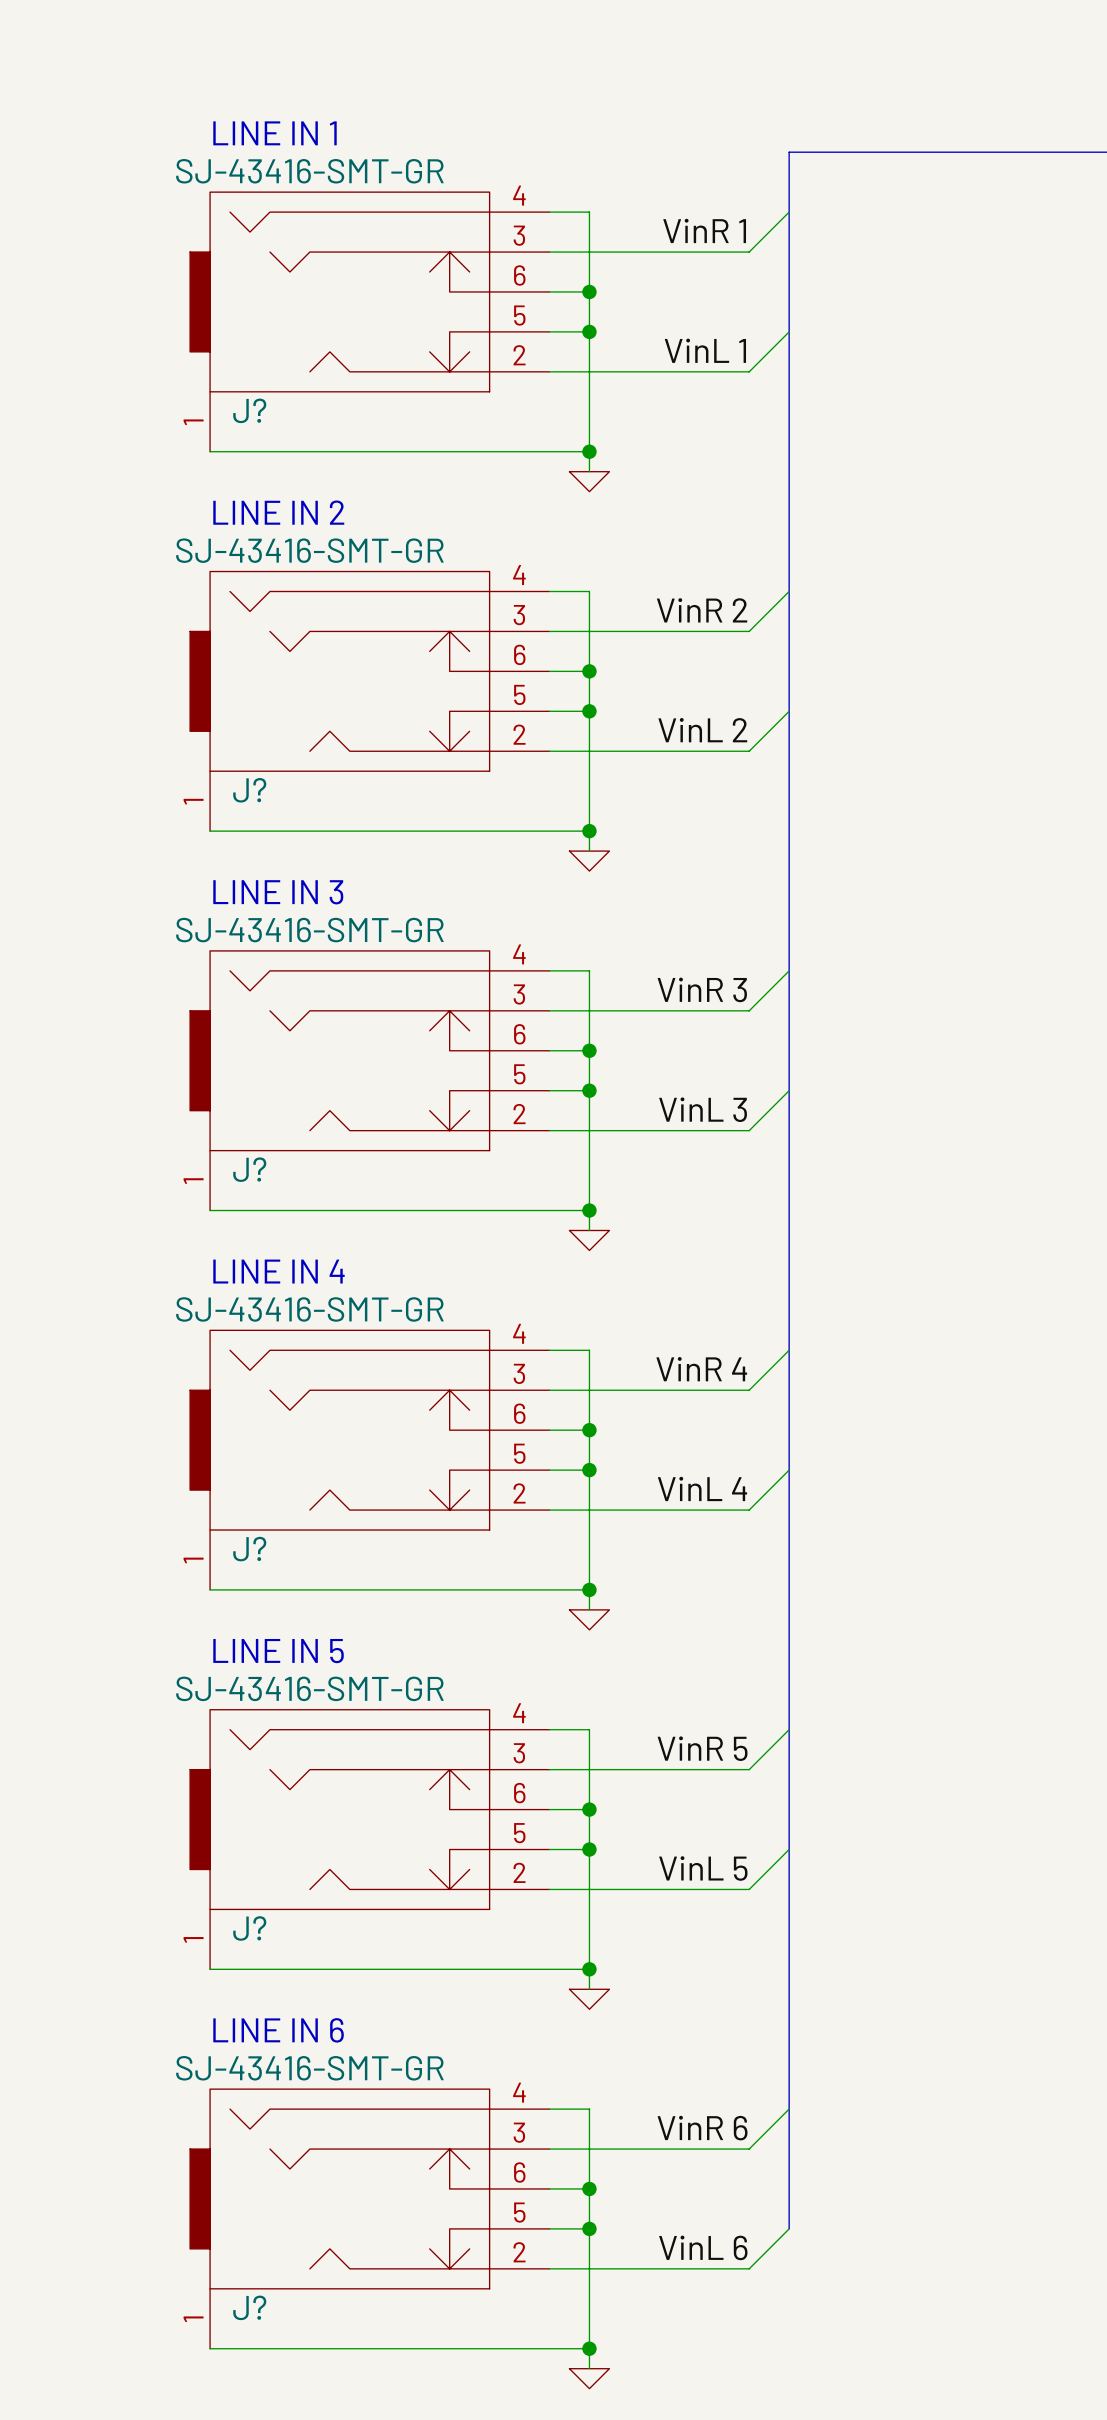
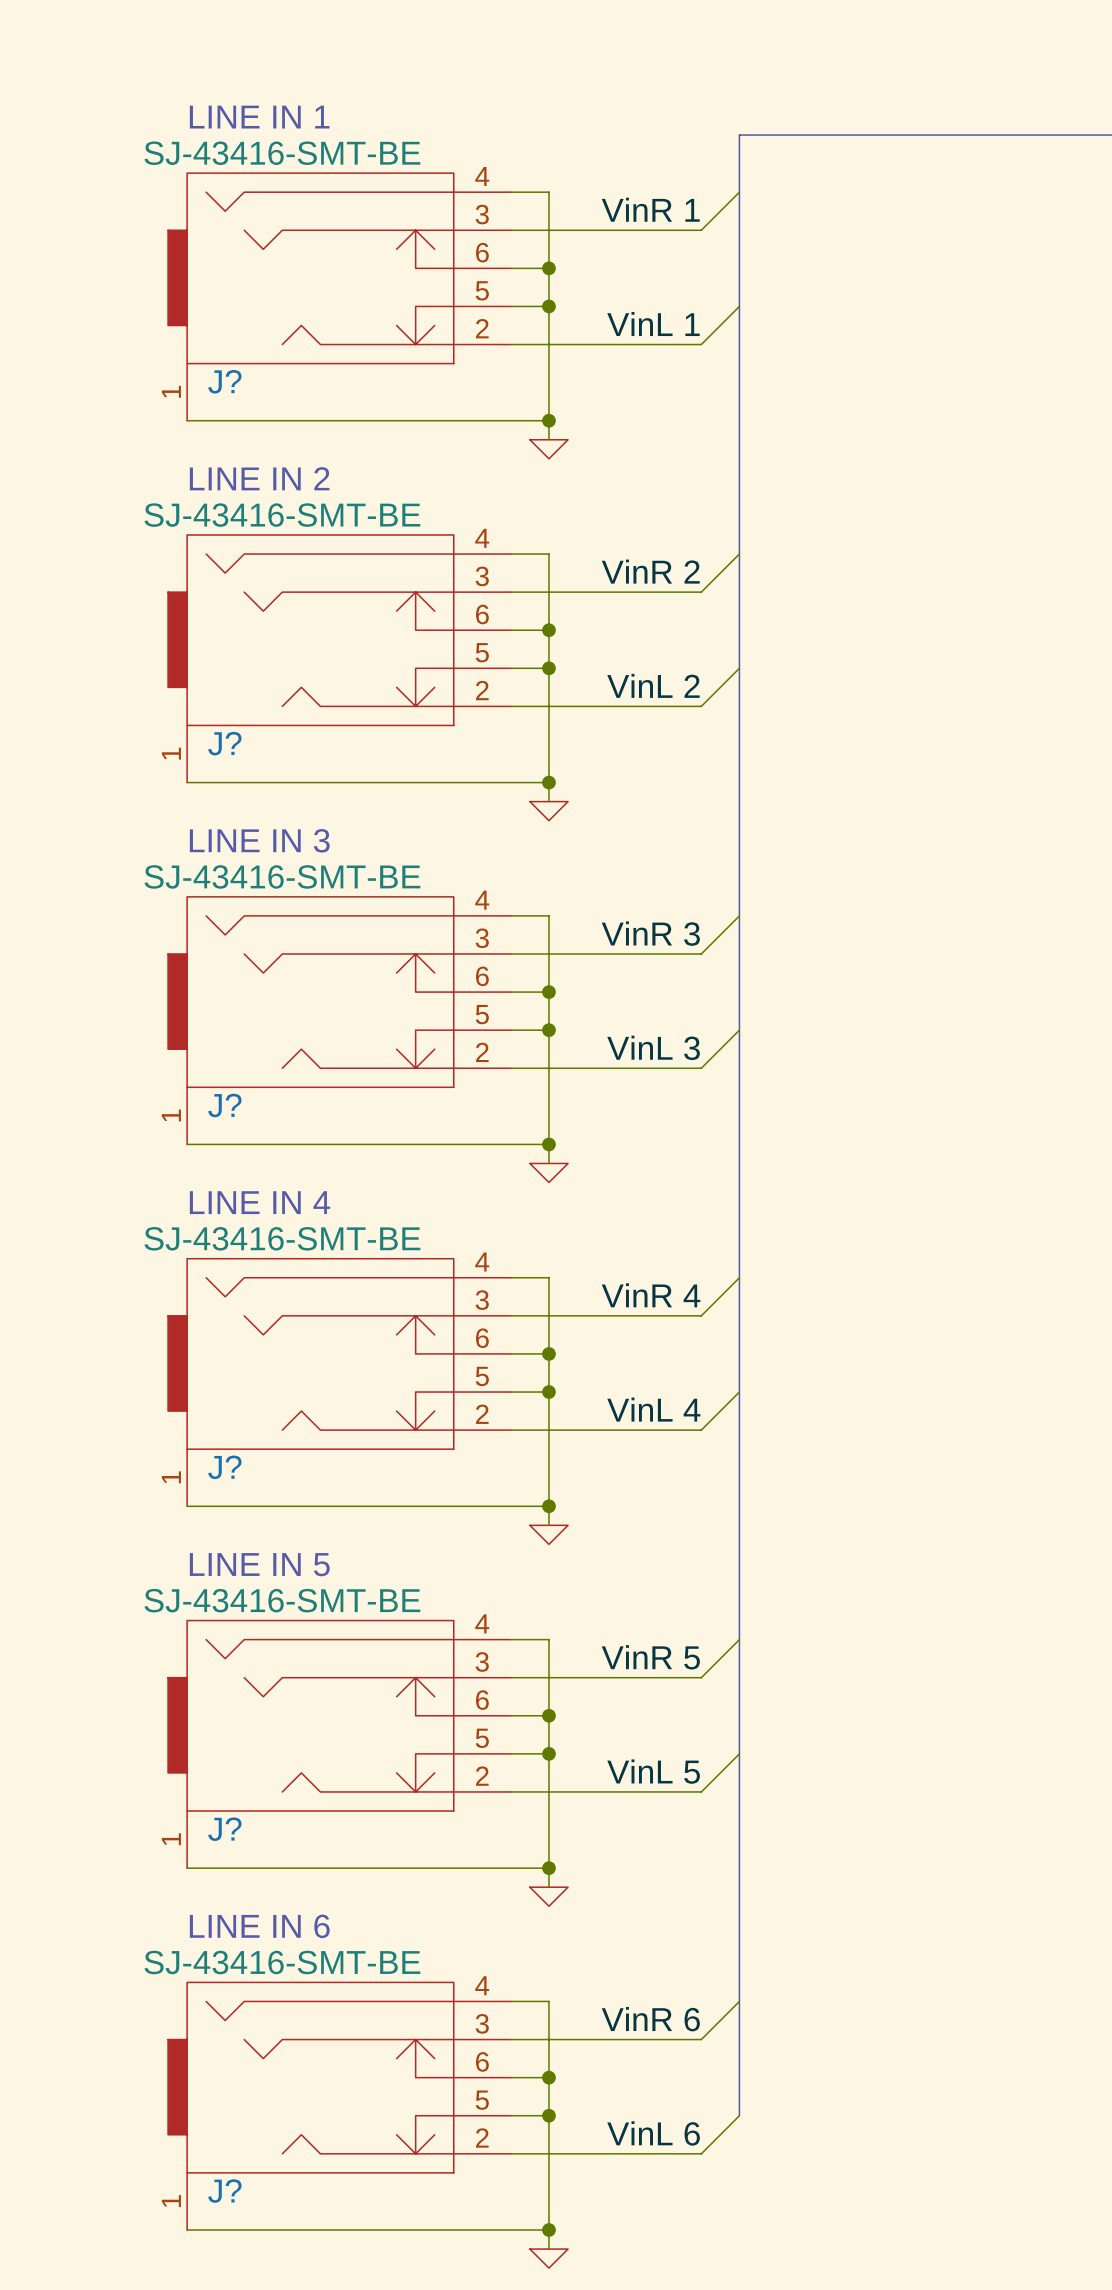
J? value: SJ-43416-SMT-GR (309, 171) -> SJ-43416-SMT-BE (282, 153)
J? value: SJ-43416-SMT-GR (309, 550) -> SJ-43416-SMT-BE (282, 515)
J? value: SJ-43416-SMT-GR (309, 930) -> SJ-43416-SMT-BE (282, 876)
J? value: SJ-43416-SMT-GR (309, 1309) -> SJ-43416-SMT-BE (282, 1238)
J? value: SJ-43416-SMT-GR (309, 1688) -> SJ-43416-SMT-BE (282, 1600)
J? value: SJ-43416-SMT-GR (309, 2068) -> SJ-43416-SMT-BE (282, 1962)

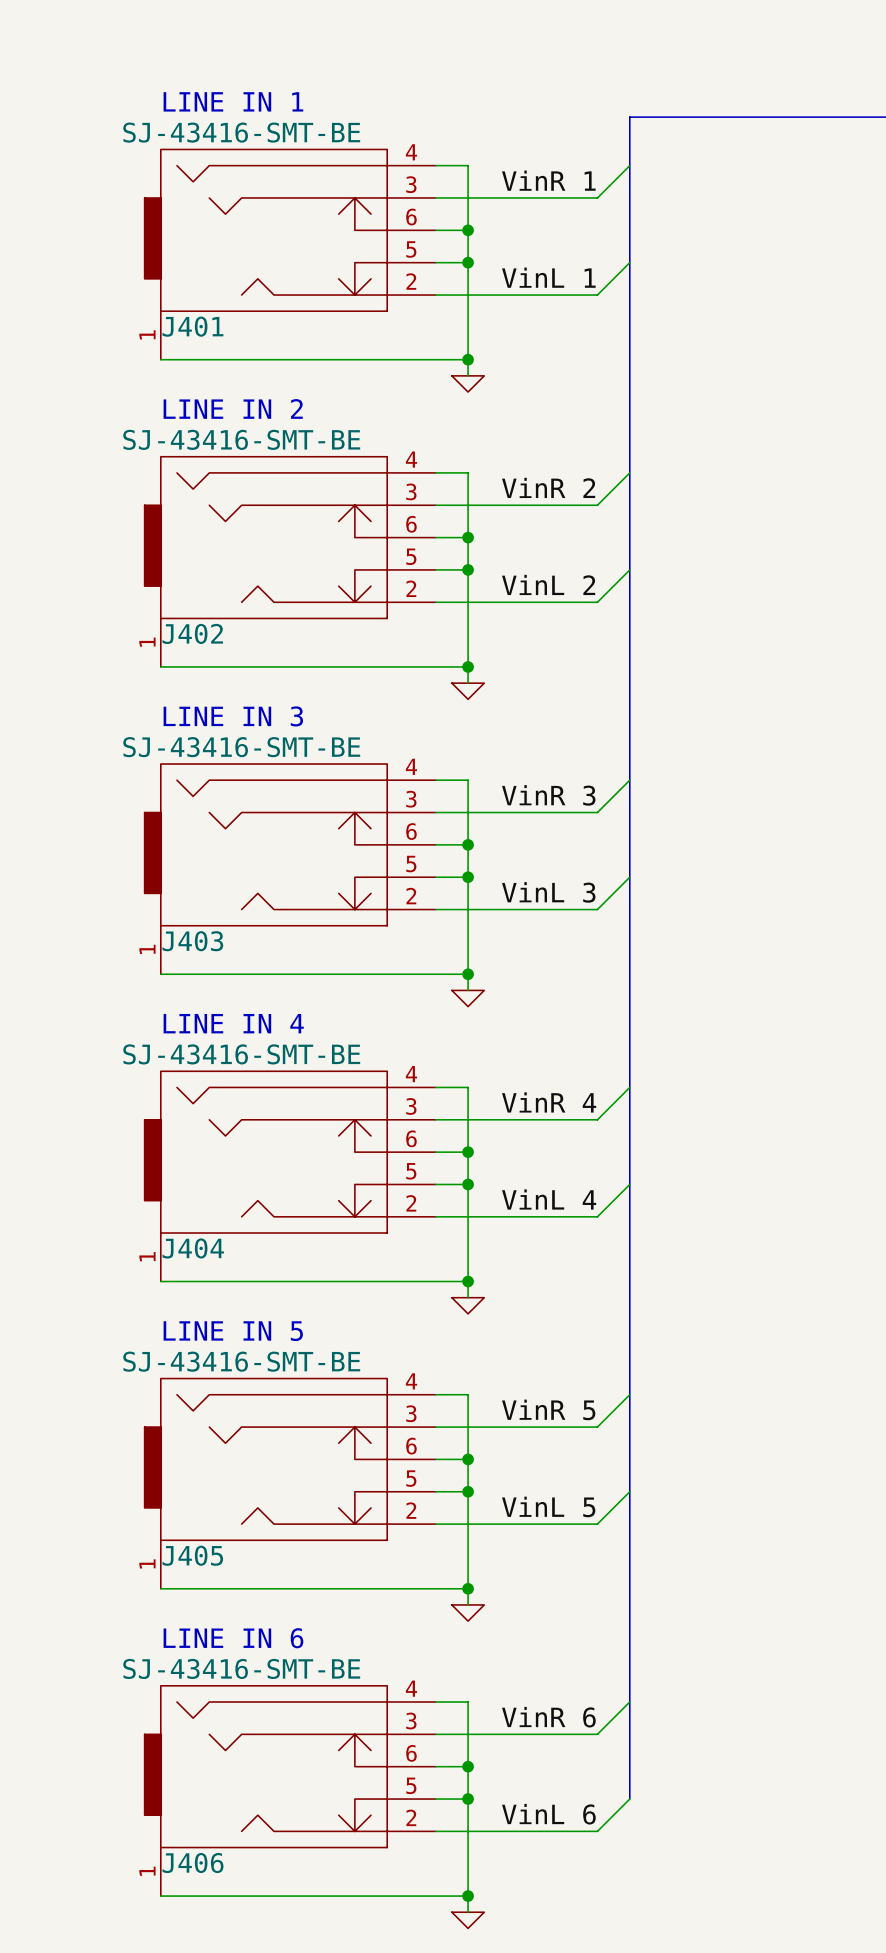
J? name: J? (224, 381) -> J401 (192, 326)
J? name: J? (224, 743) -> J402 (192, 633)
J? name: J? (224, 1105) -> J403 (192, 941)
J? name: J? (224, 1467) -> J404 (193, 1248)
J? name: J? (224, 1829) -> J405 (192, 1555)
J? name: J? (224, 2191) -> J406 (192, 1863)

